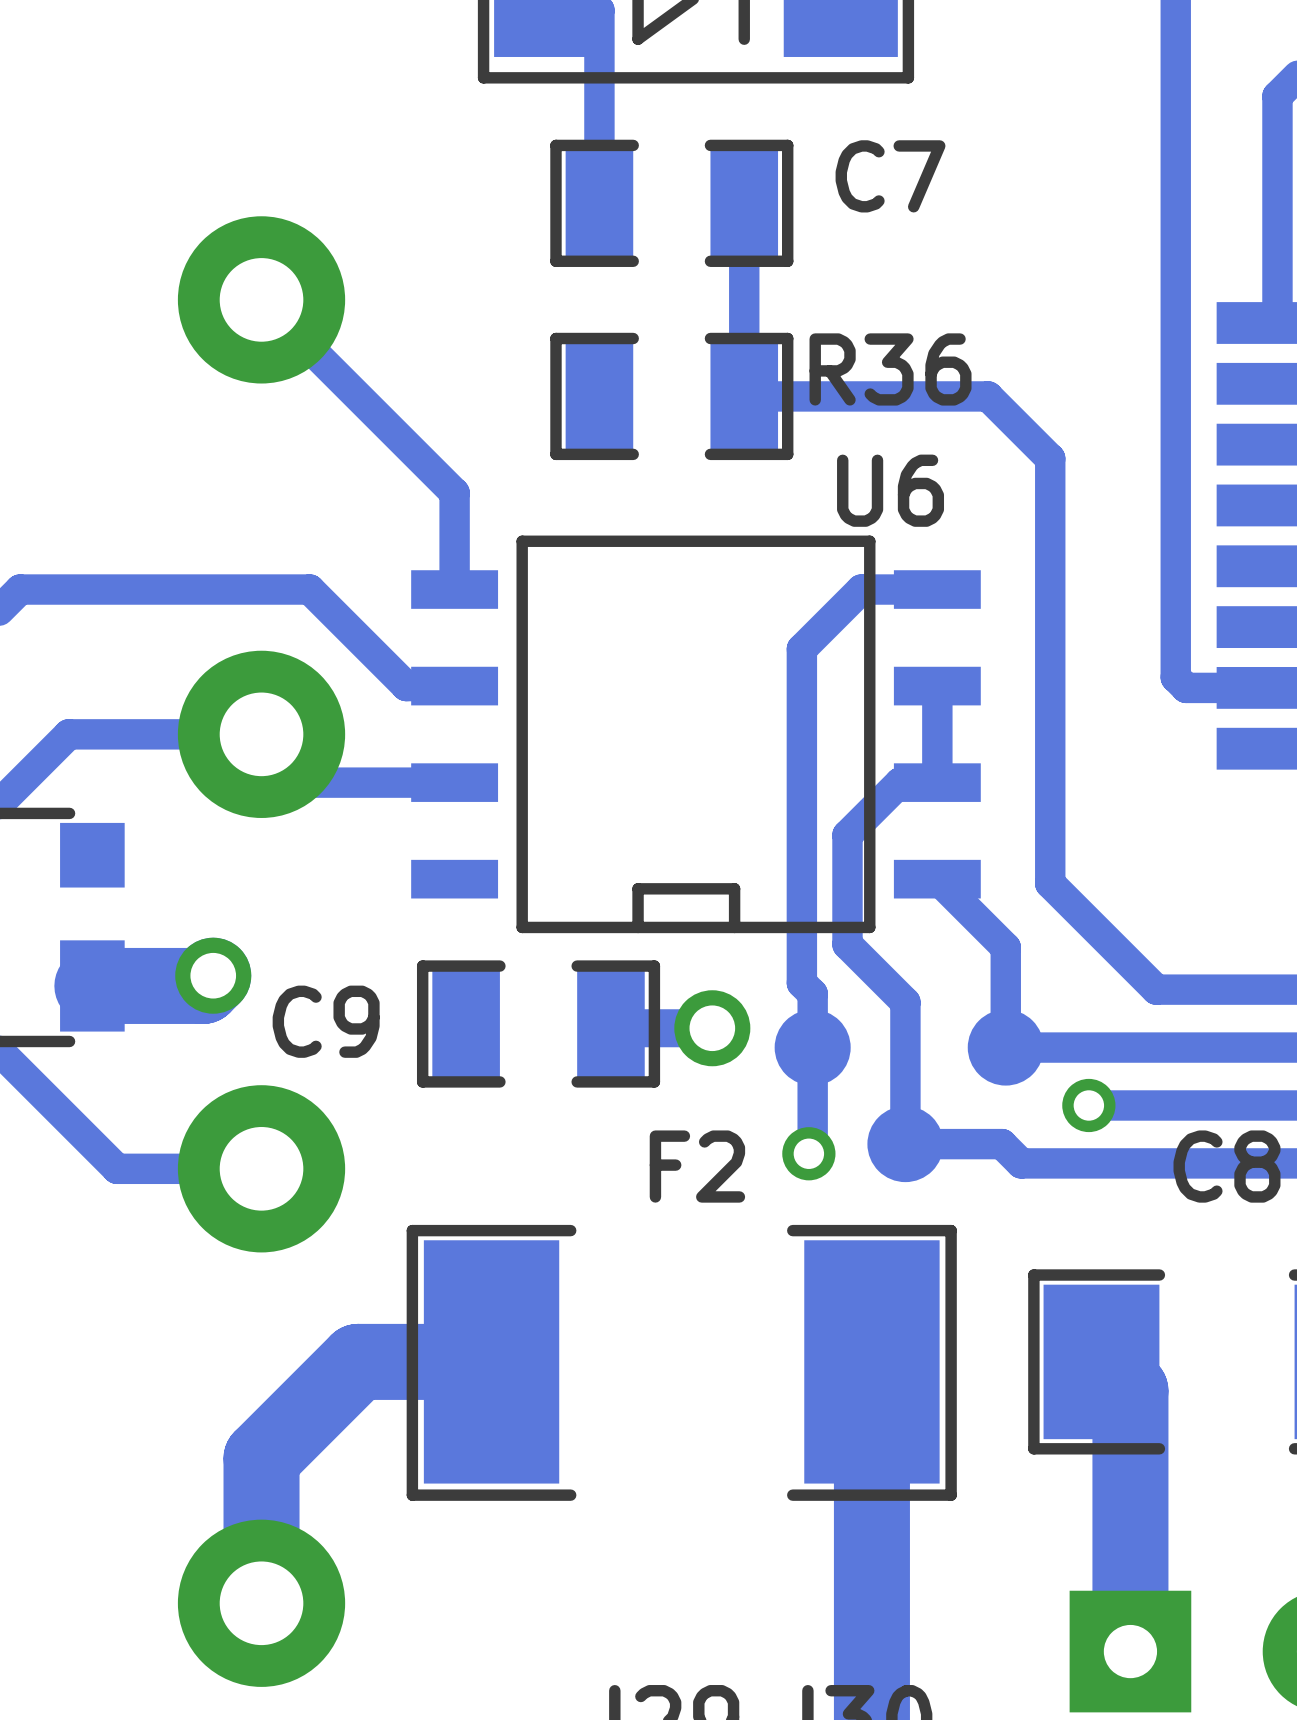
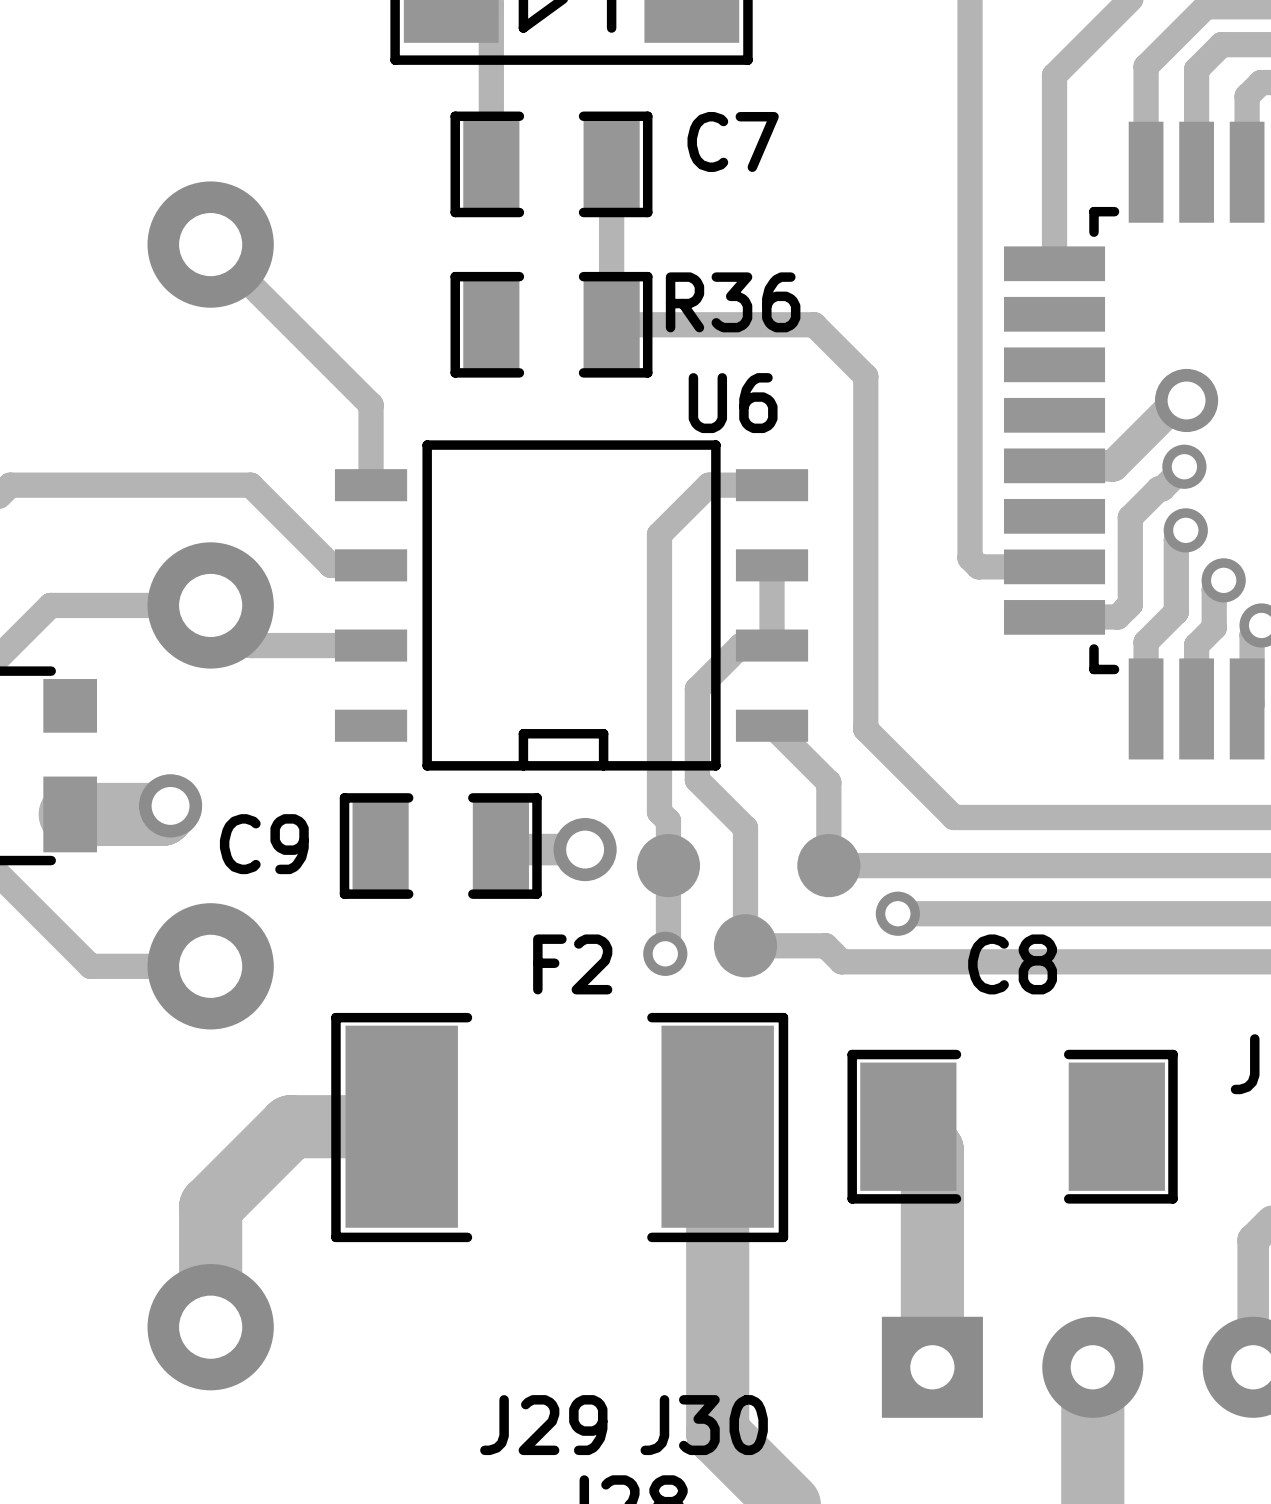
part footprint: [177, 216, 346, 384] -> [147, 181, 274, 308]
part footprint: [177, 650, 346, 818] -> [147, 542, 274, 669]
part footprint: [177, 1085, 346, 1253] -> [147, 903, 274, 1030]
part footprint: [177, 1519, 346, 1687] -> [147, 1264, 274, 1391]

